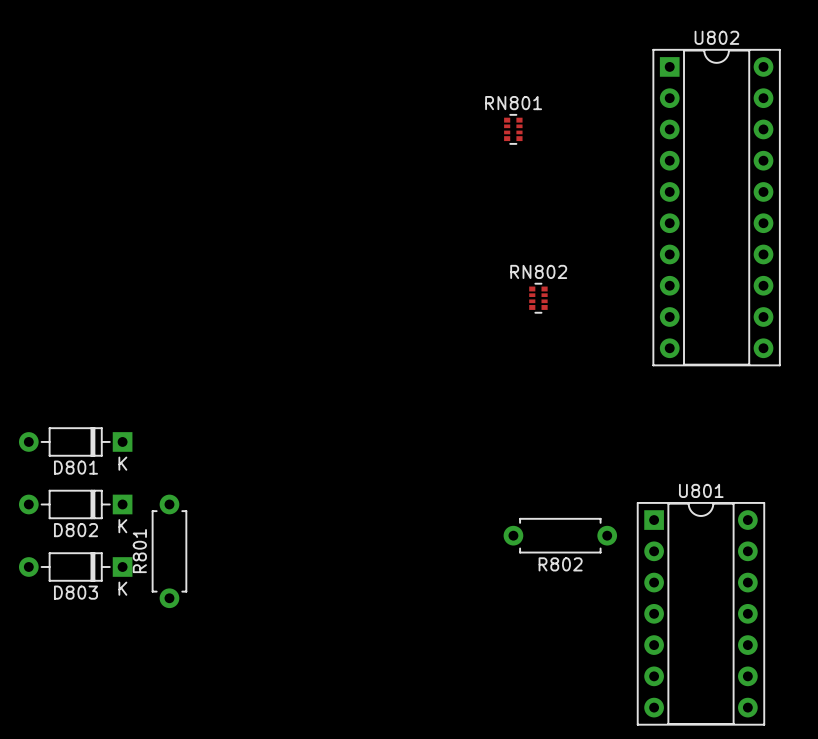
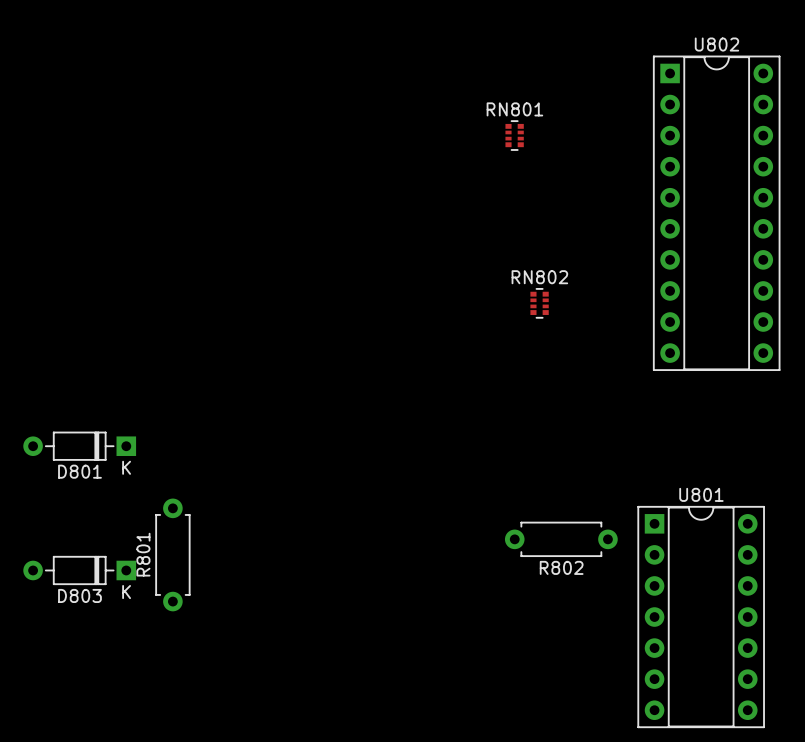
D802: (75, 504) -> none

